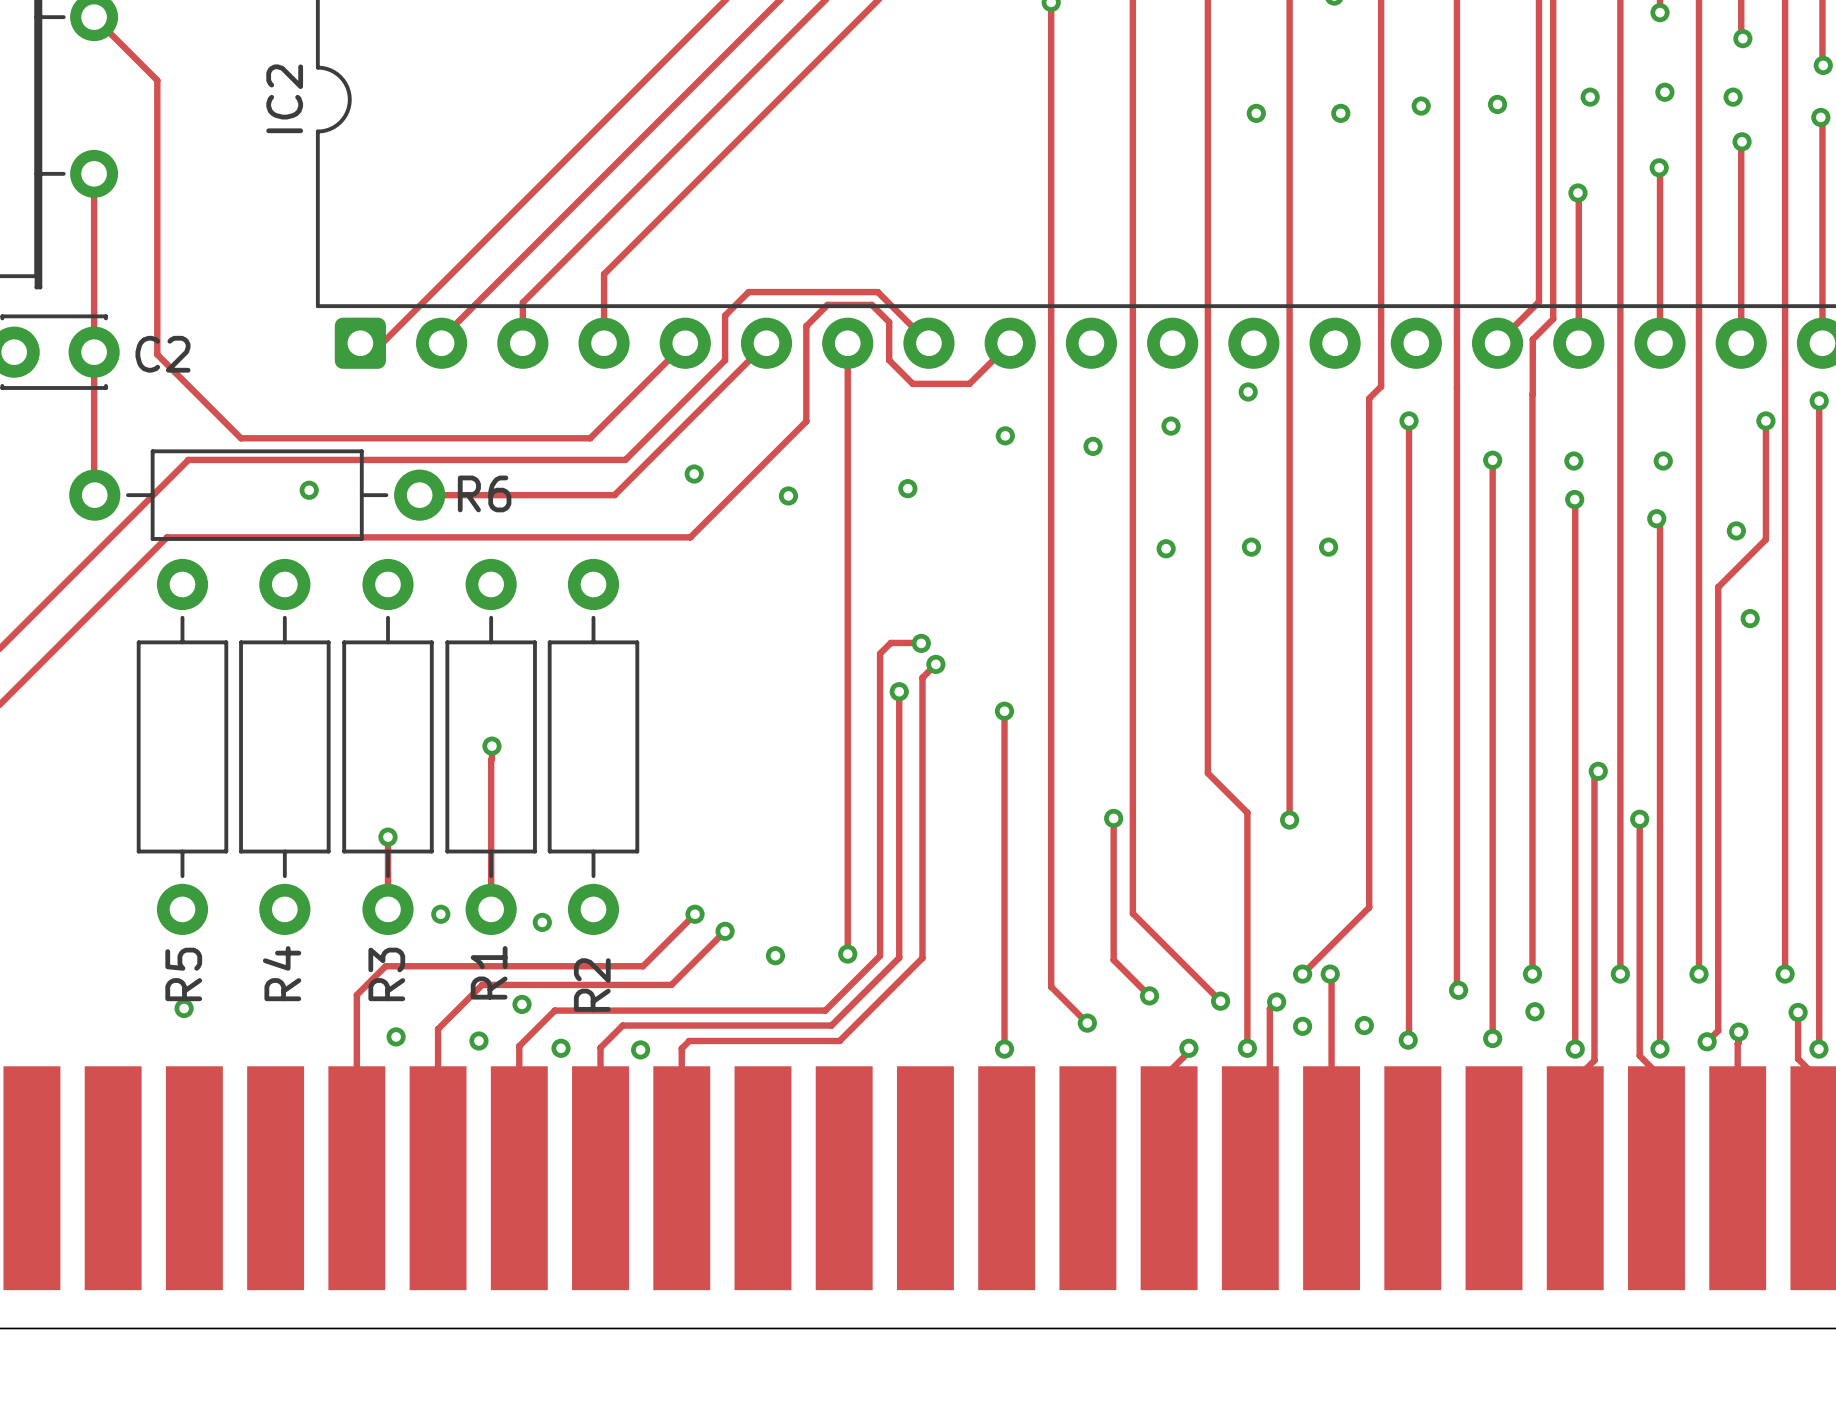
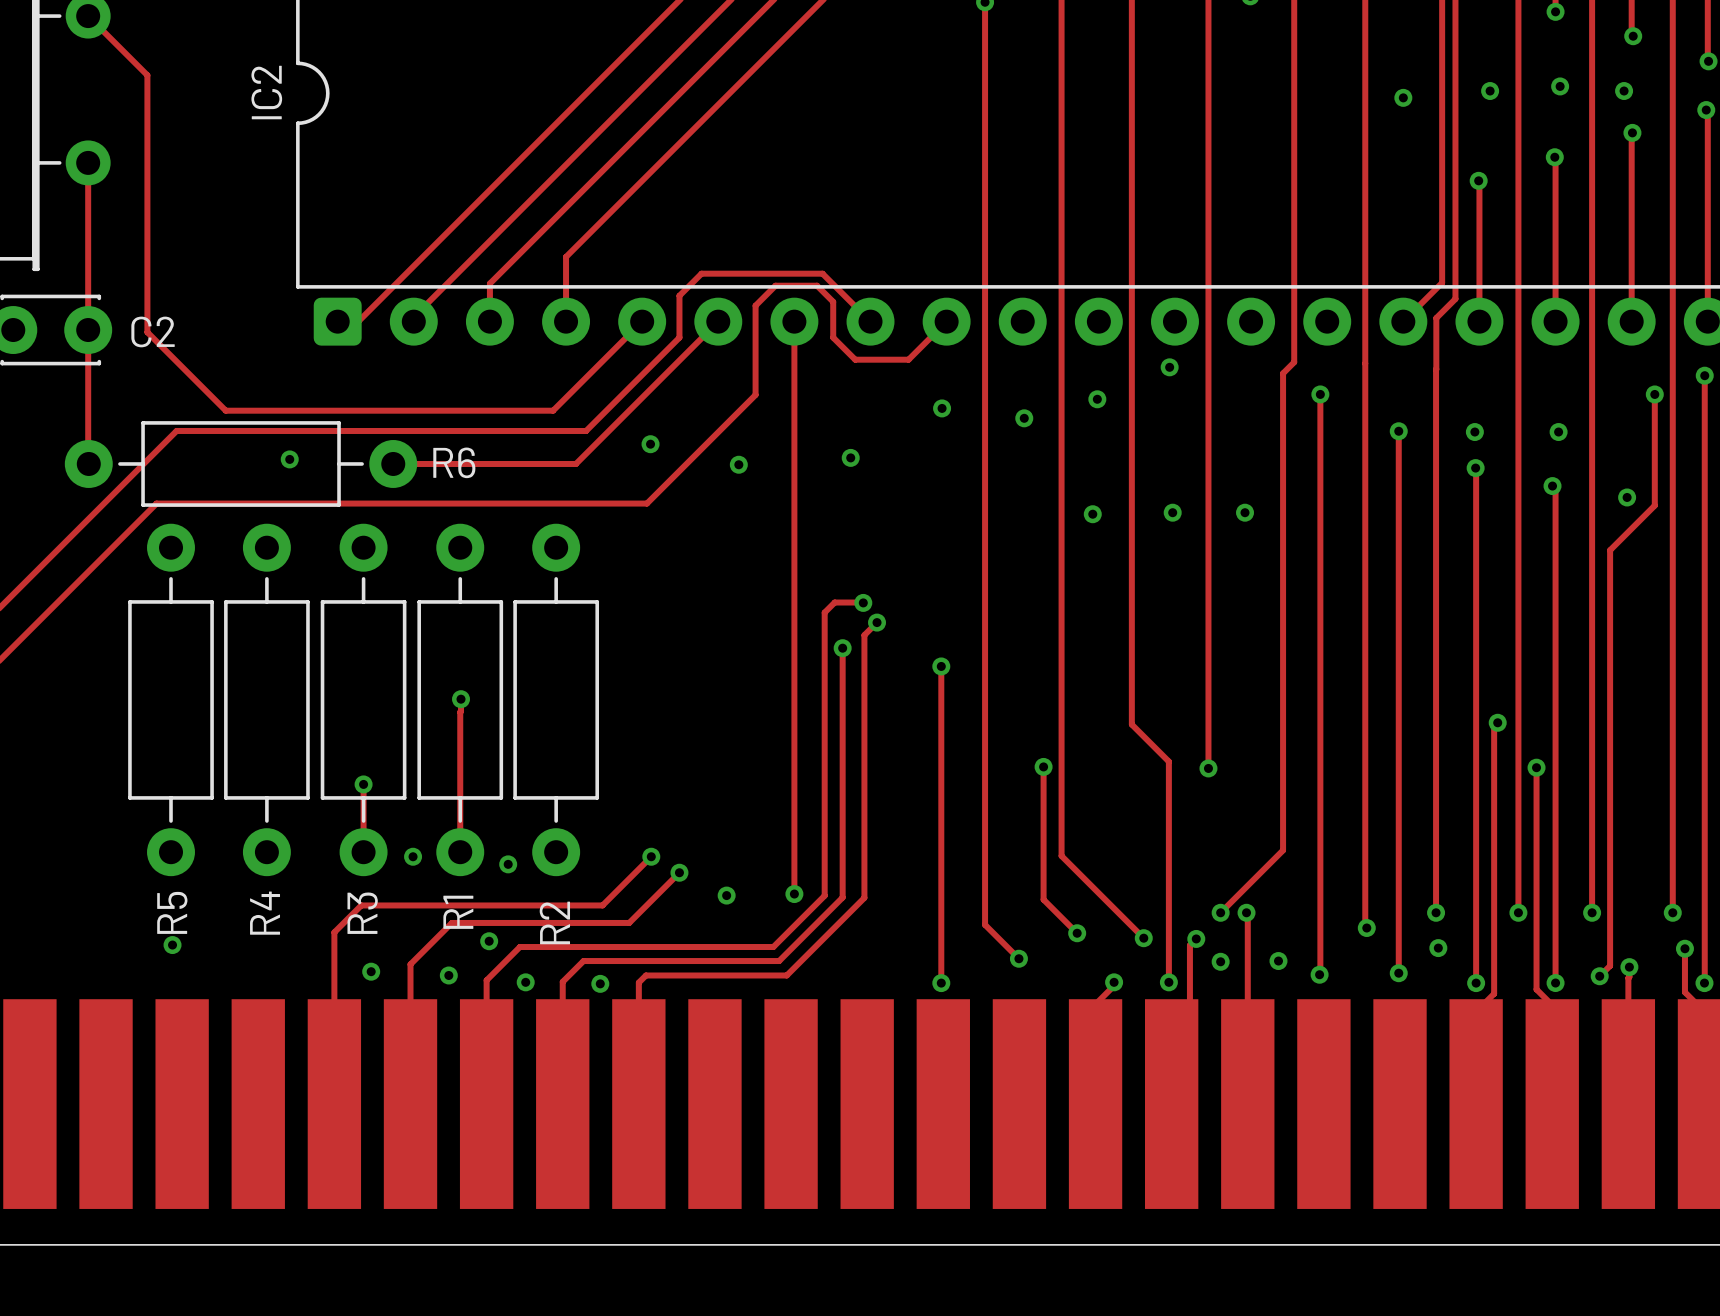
via: (1421, 106) -> none
via: (1256, 113) -> none
via: (1340, 113) -> none
via: (1750, 618) -> none

